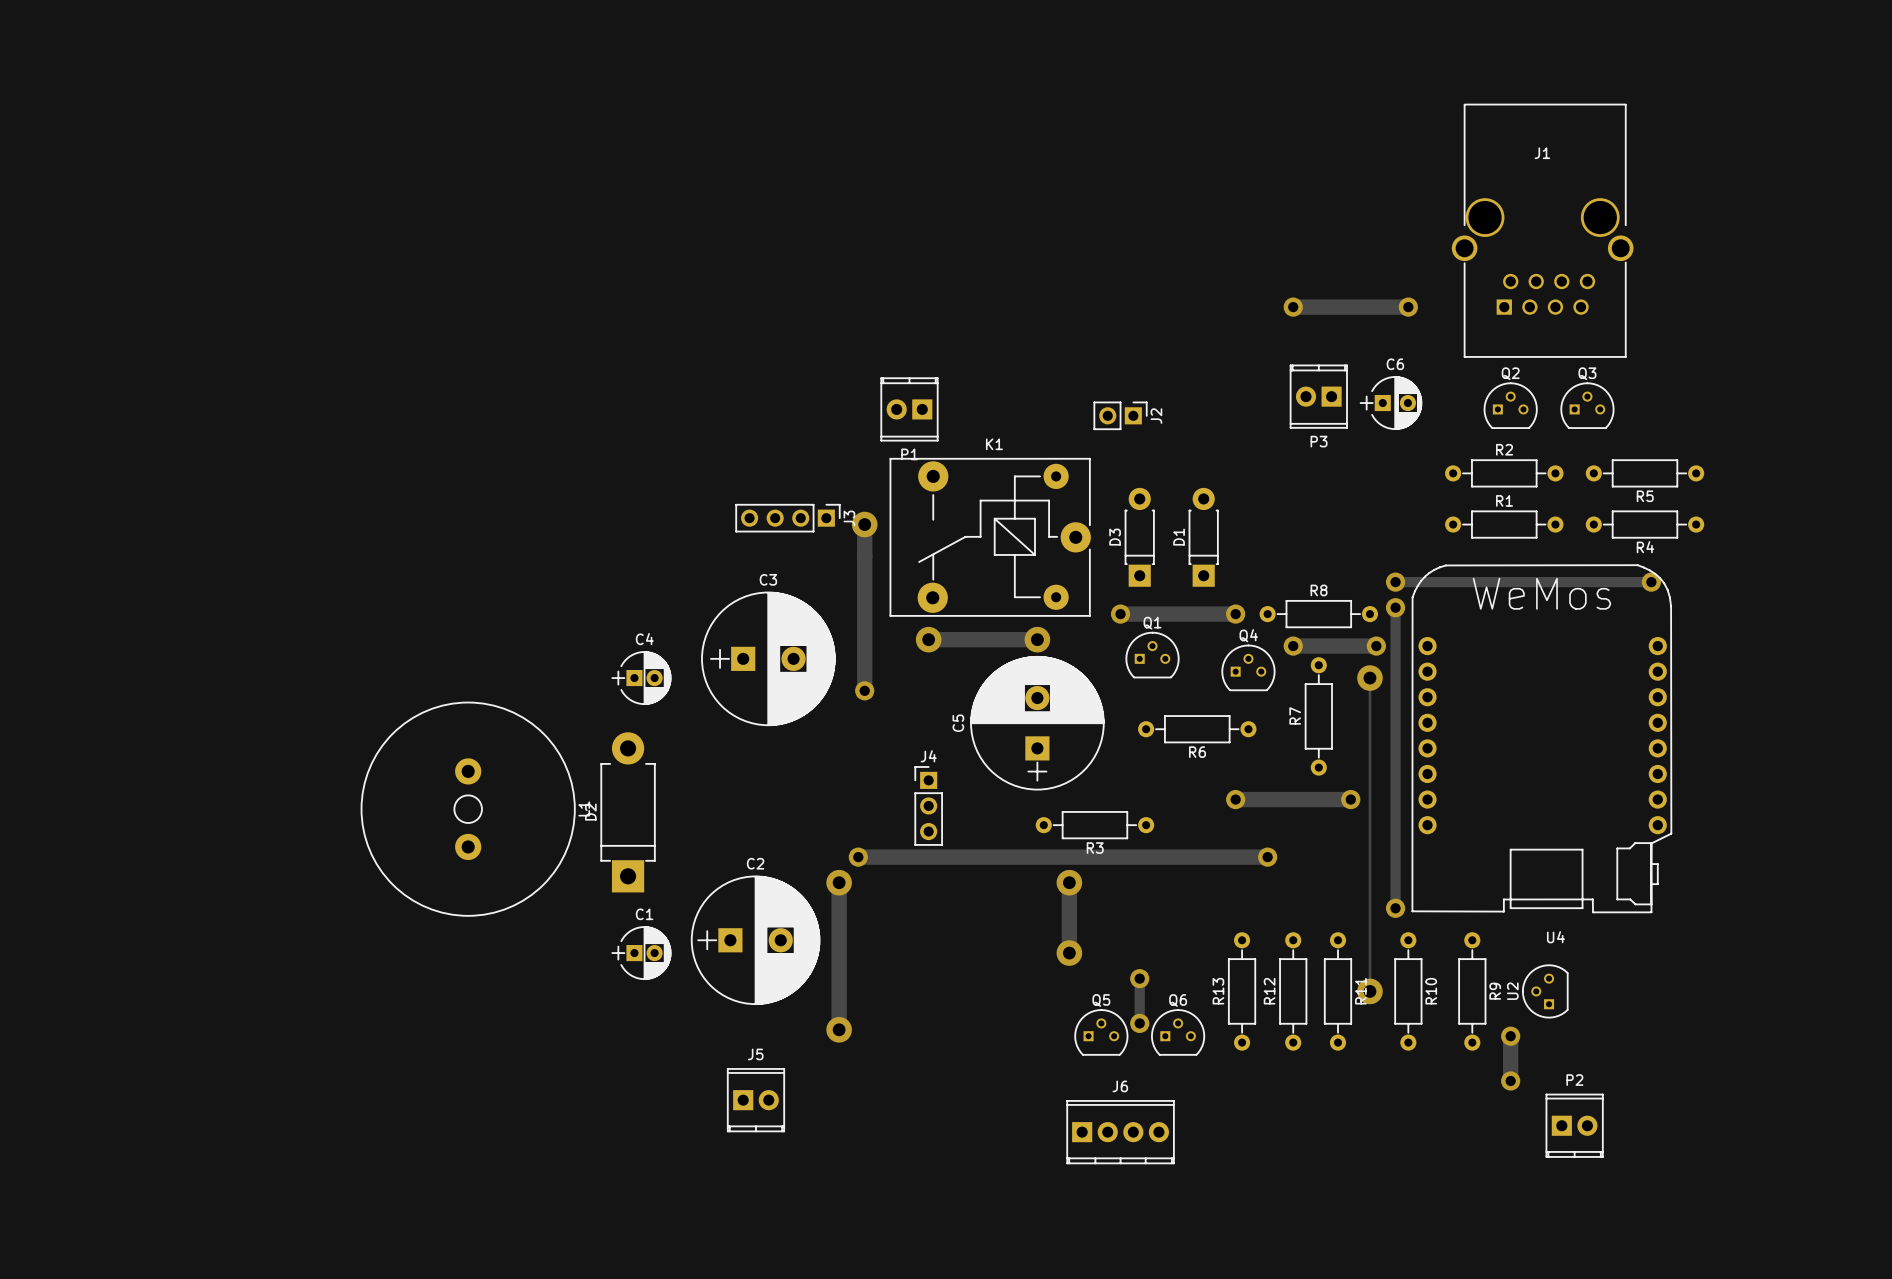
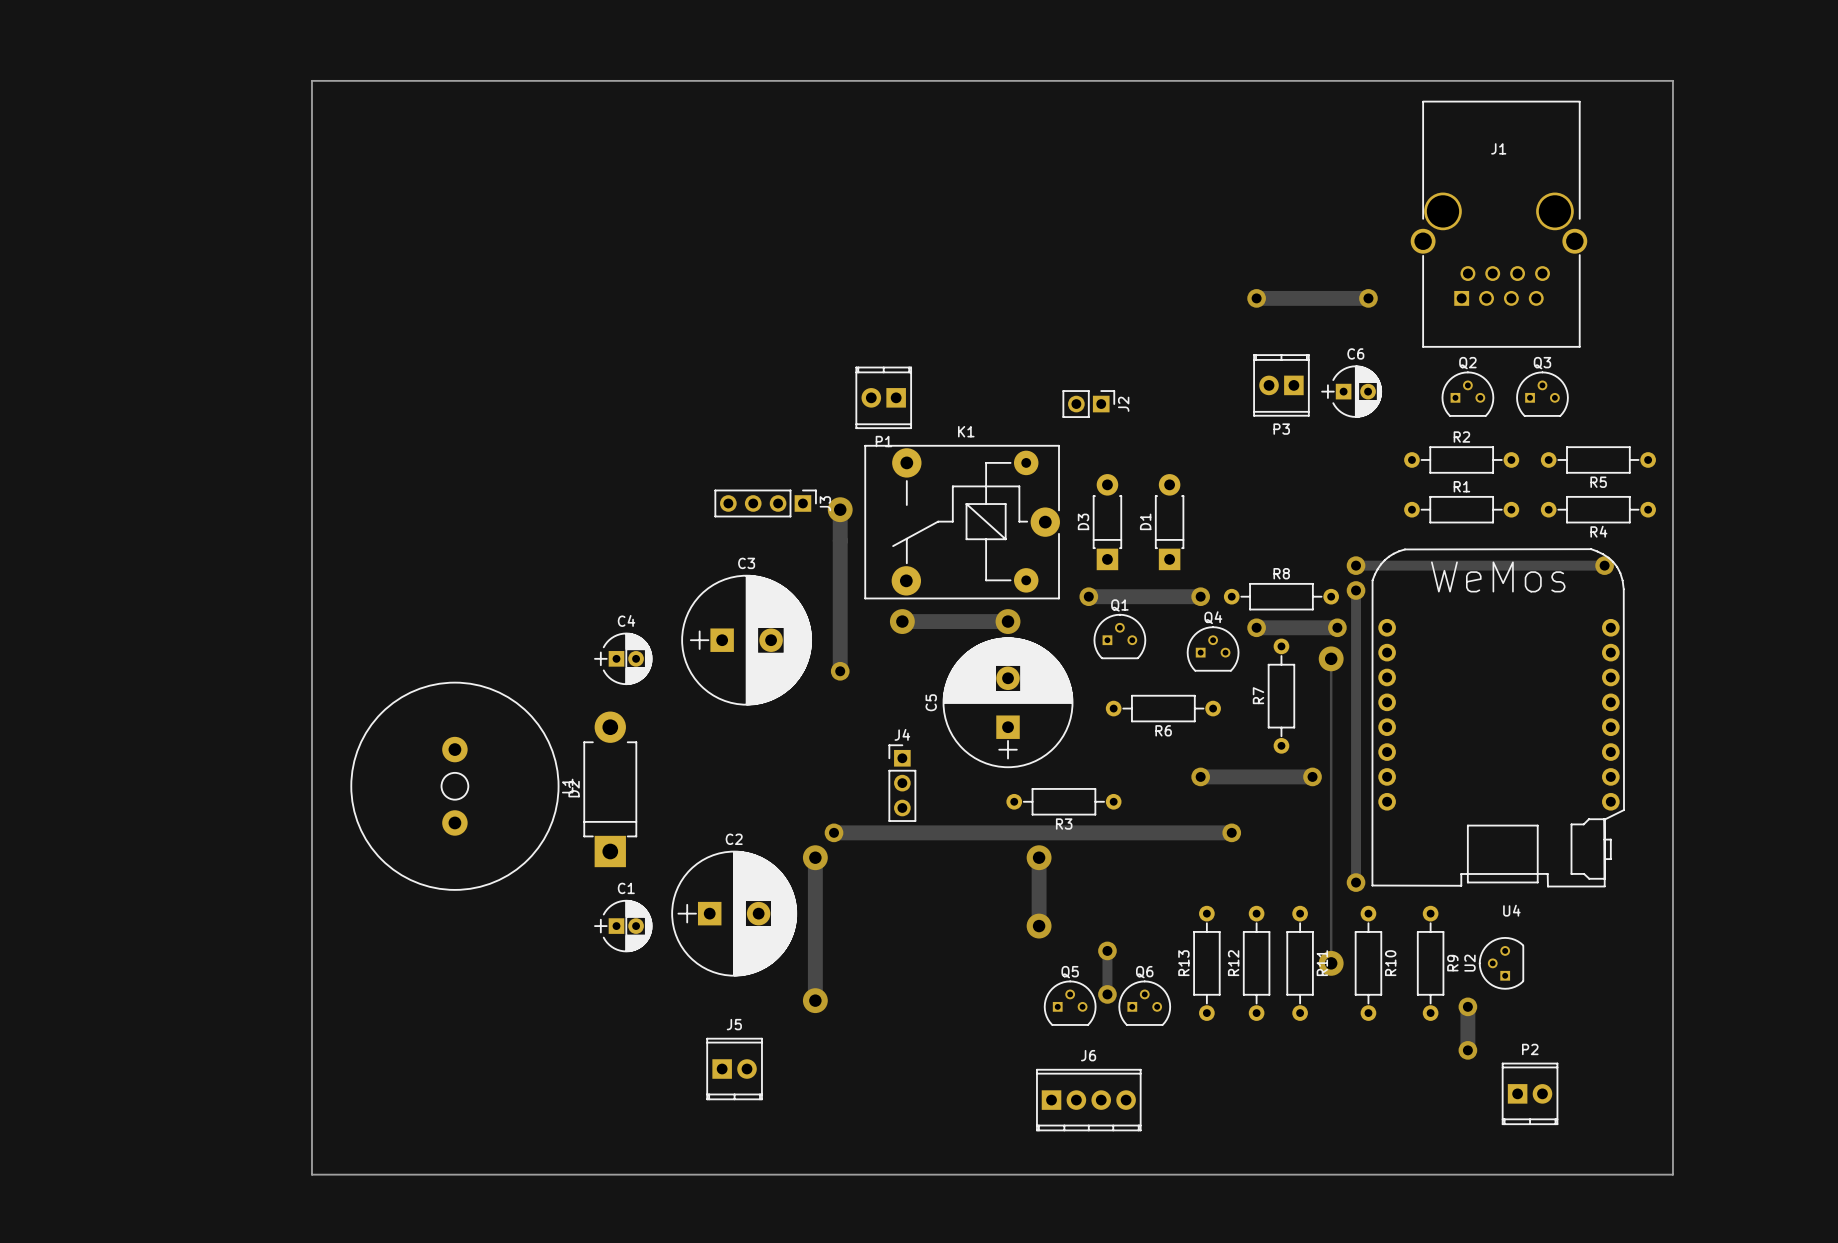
board edge: none -> (311, 80) (1672, 80) (1672, 1174) (311, 1174) (311, 80)

